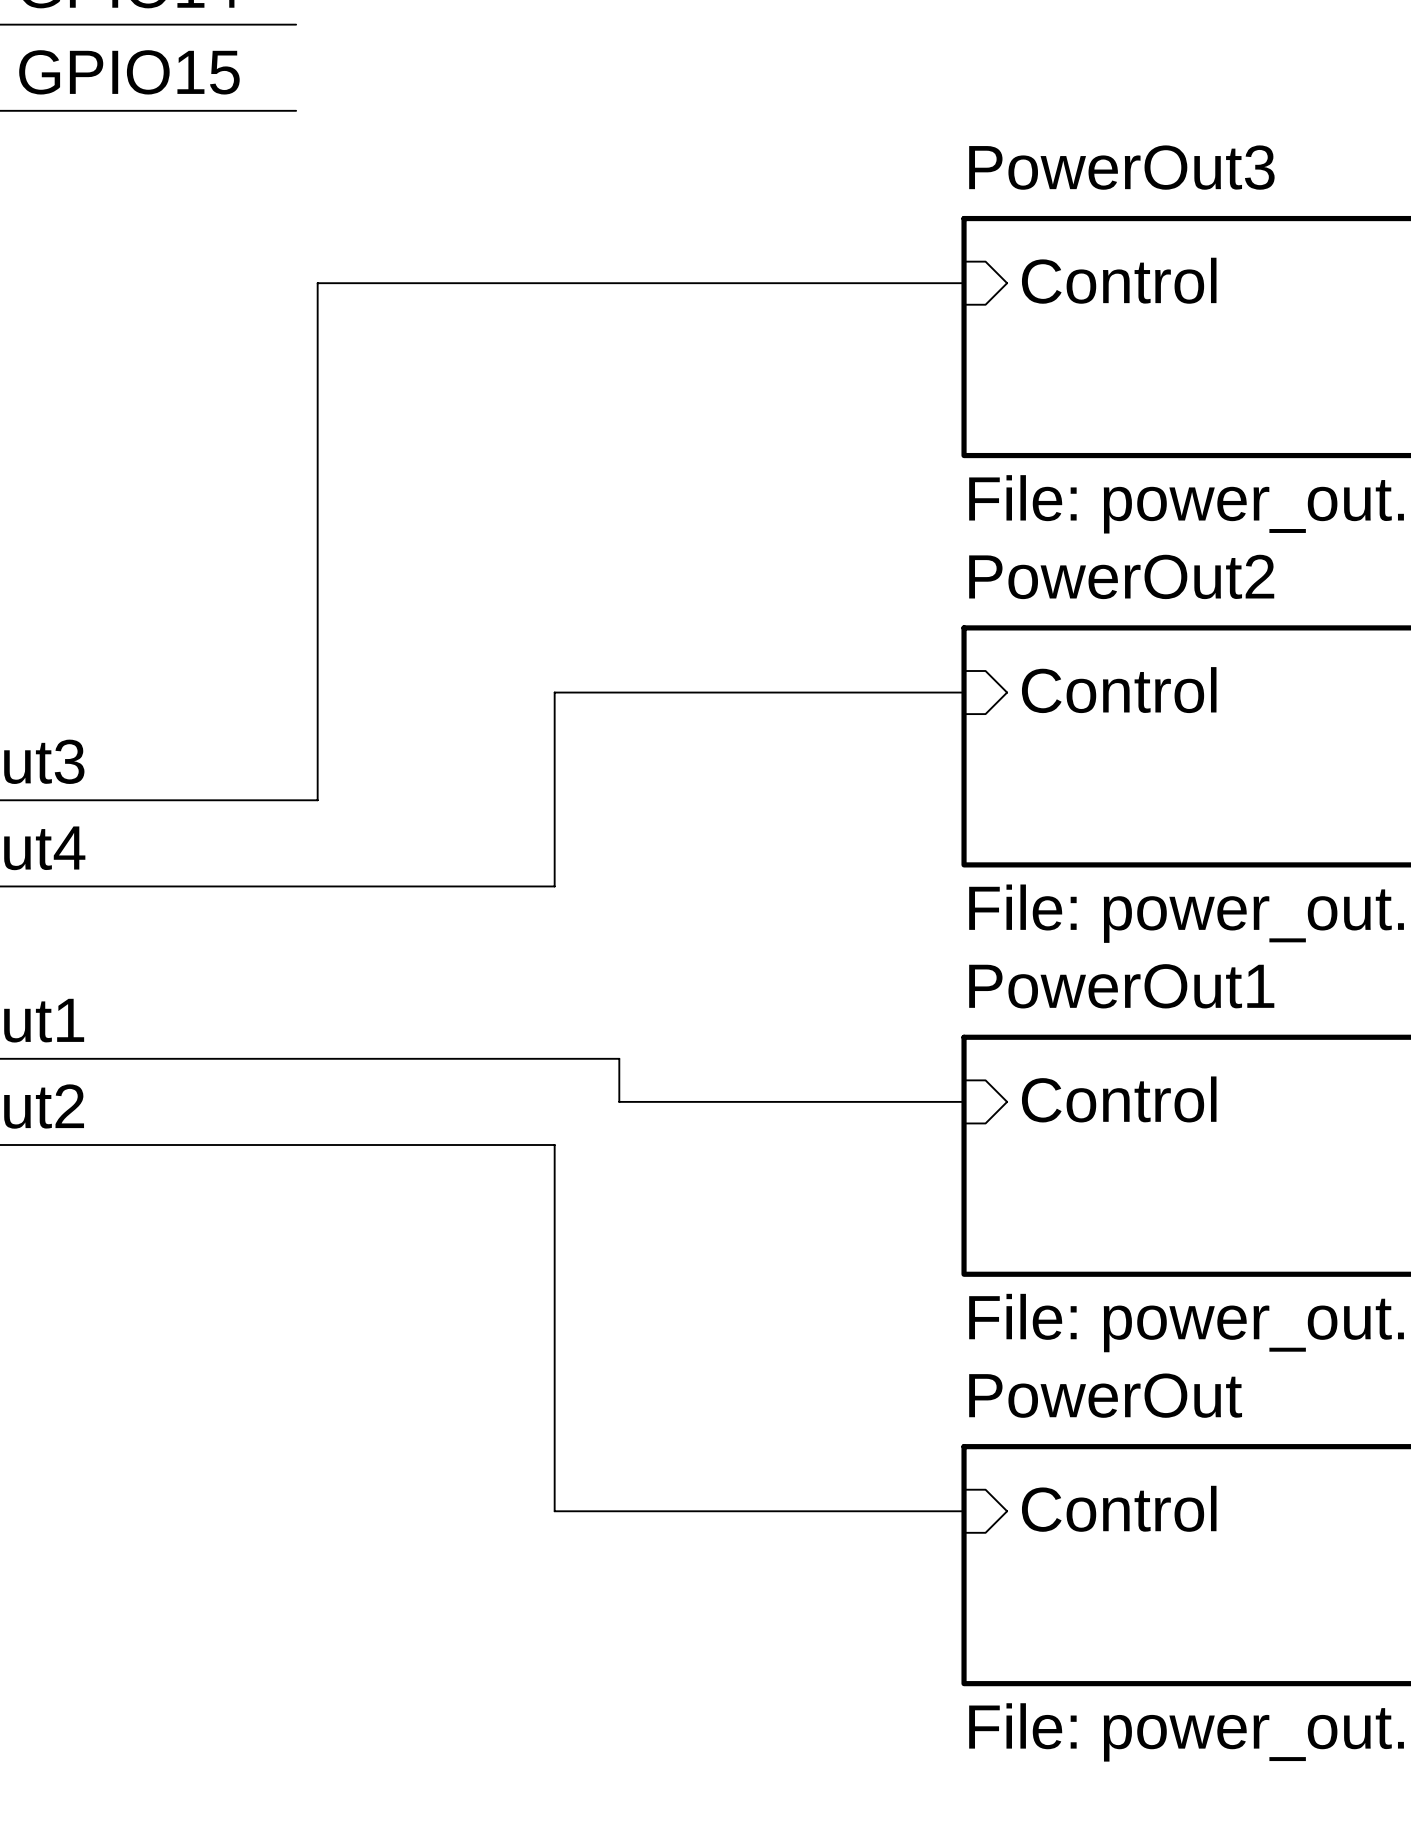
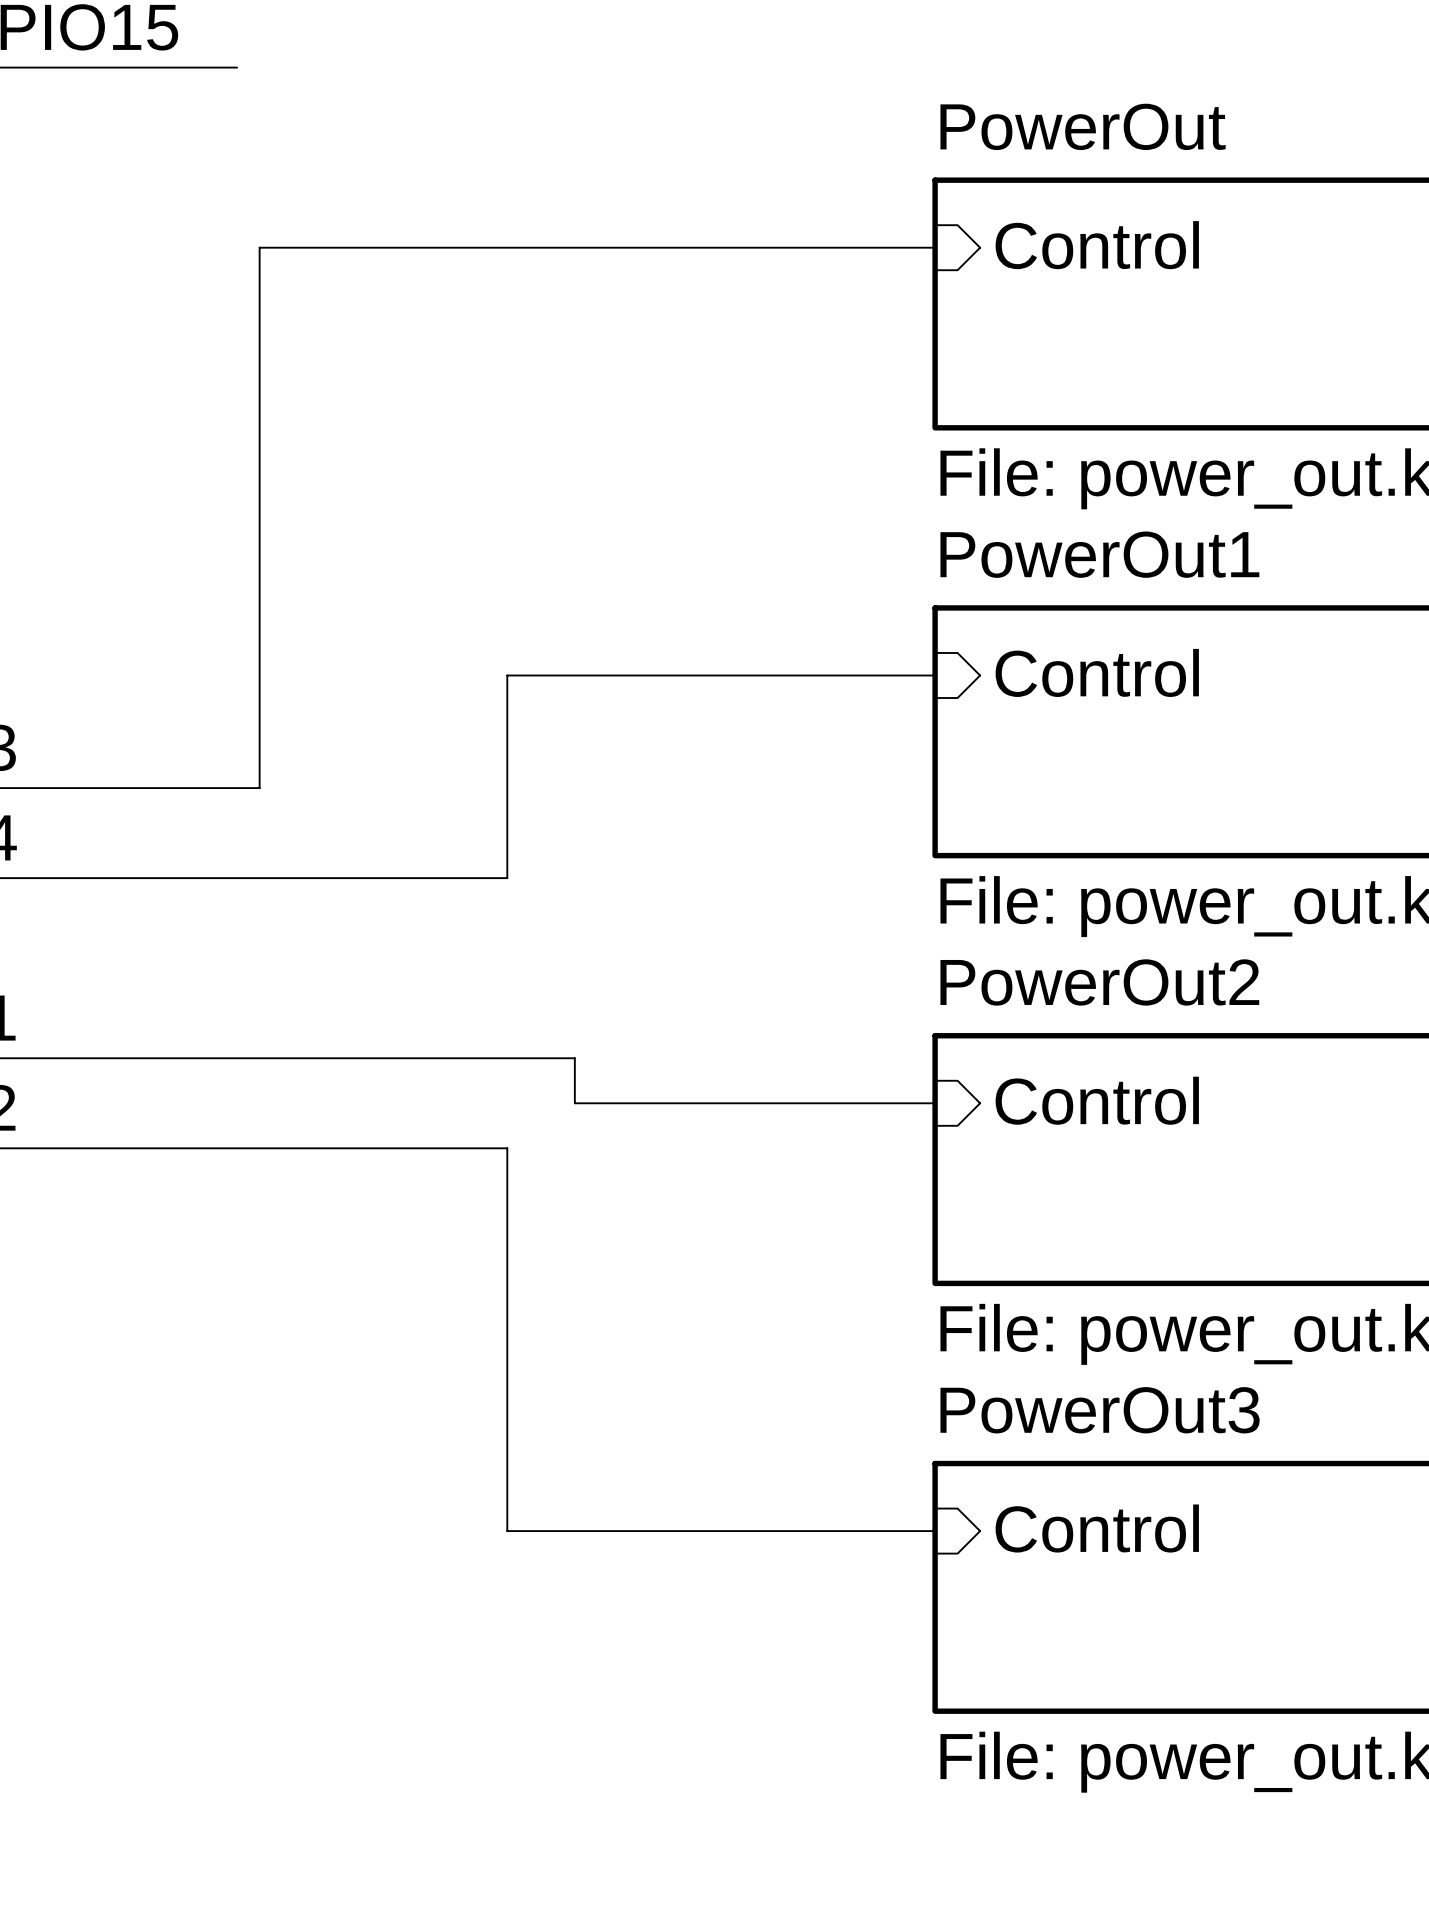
sheet PowerOut3 name: PowerOut3 (1121, 167) -> PowerOut (1083, 126)
sheet PowerOut2 name: PowerOut2 (1121, 576) -> PowerOut1 (1099, 554)
sheet PowerOut1 name: PowerOut1 (1121, 986) -> PowerOut2 (1099, 982)
sheet PowerOut name: PowerOut (1105, 1395) -> PowerOut3 (1100, 1410)

